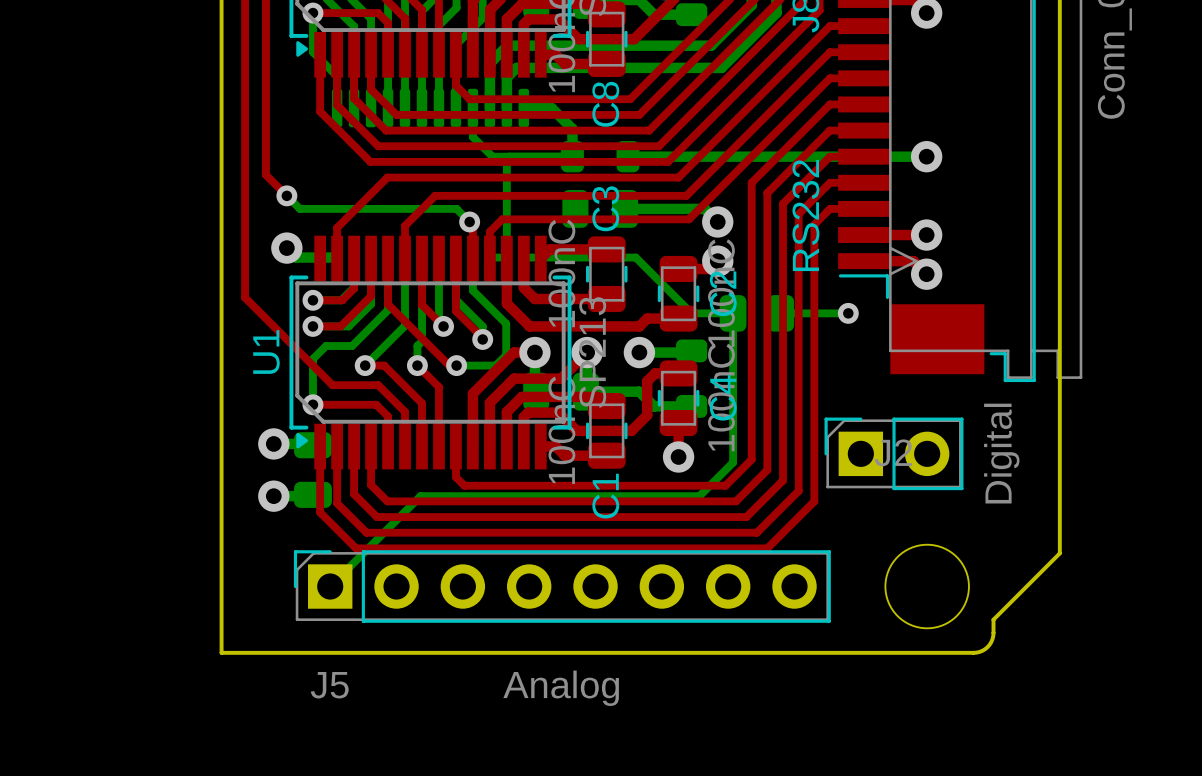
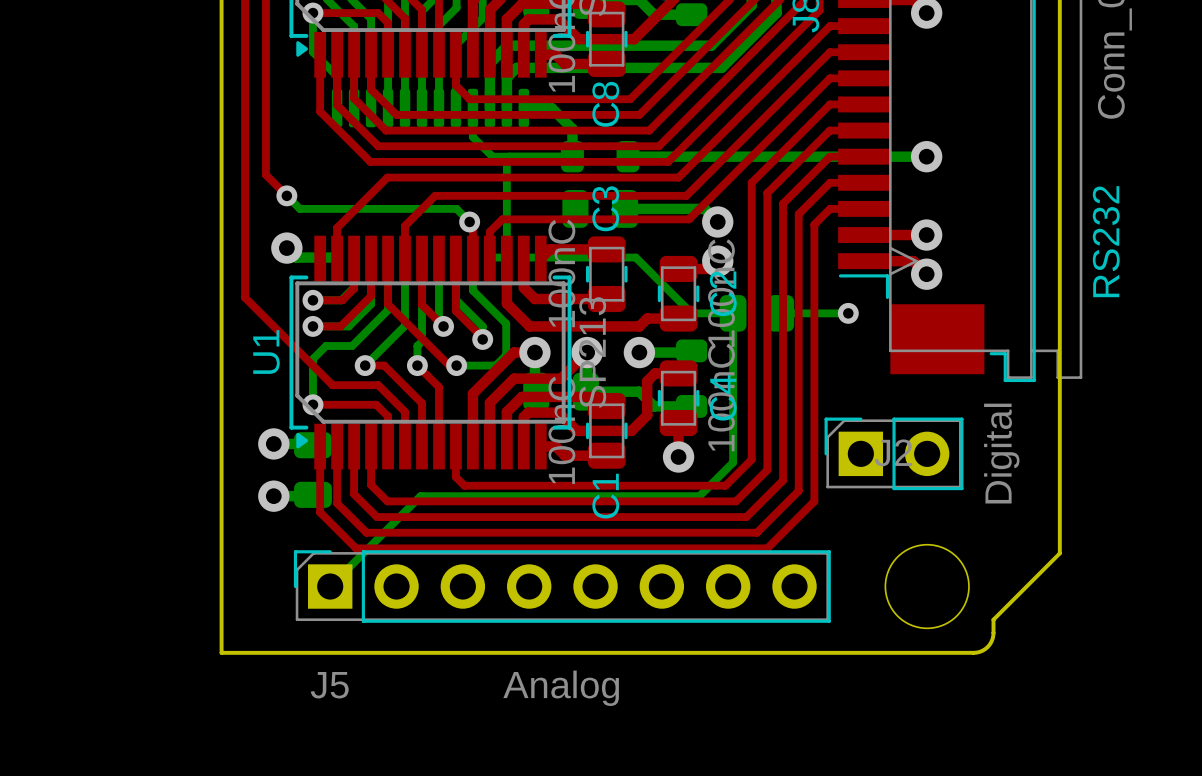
text position: RS232 (805, 215) -> RS232 (1106, 241)

